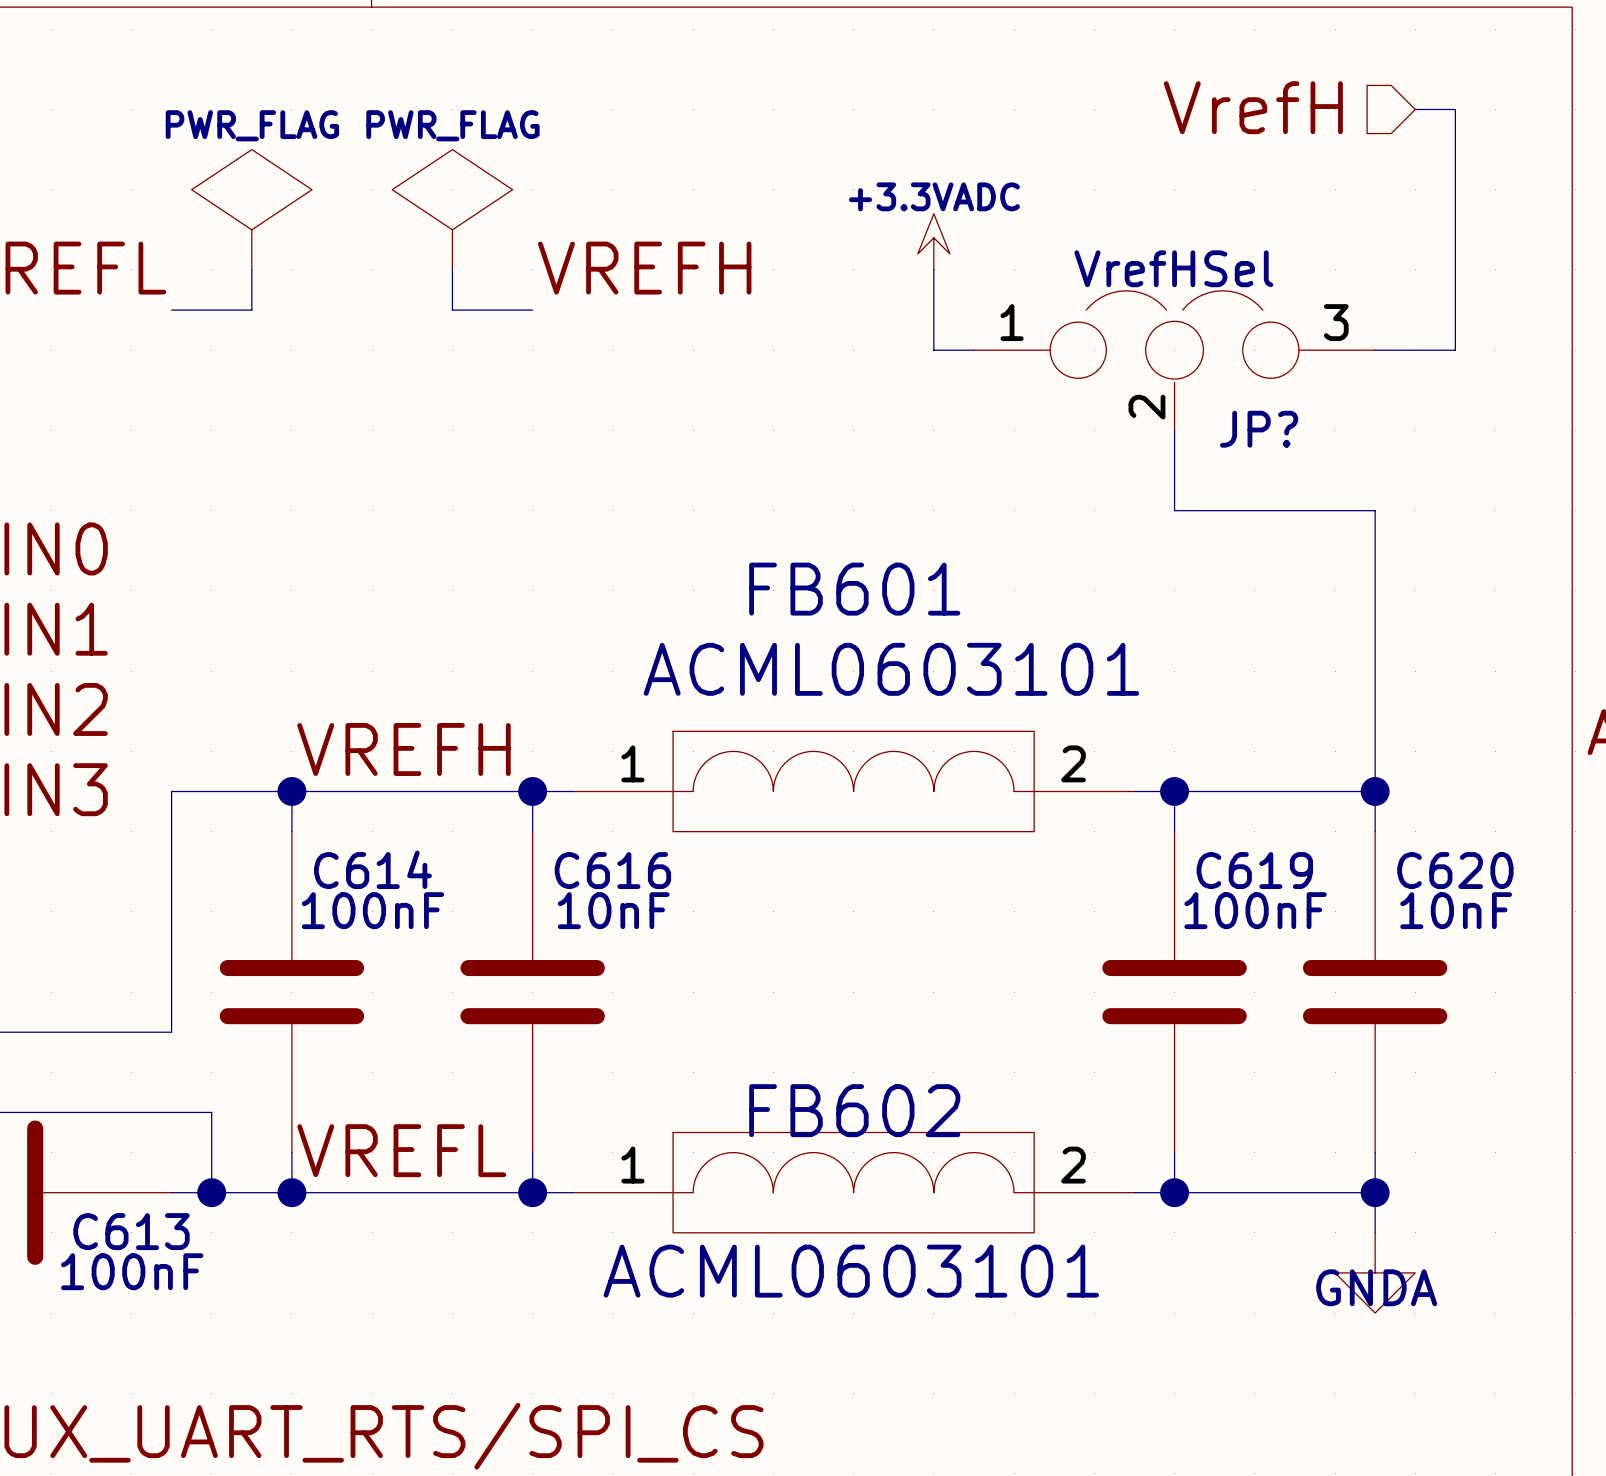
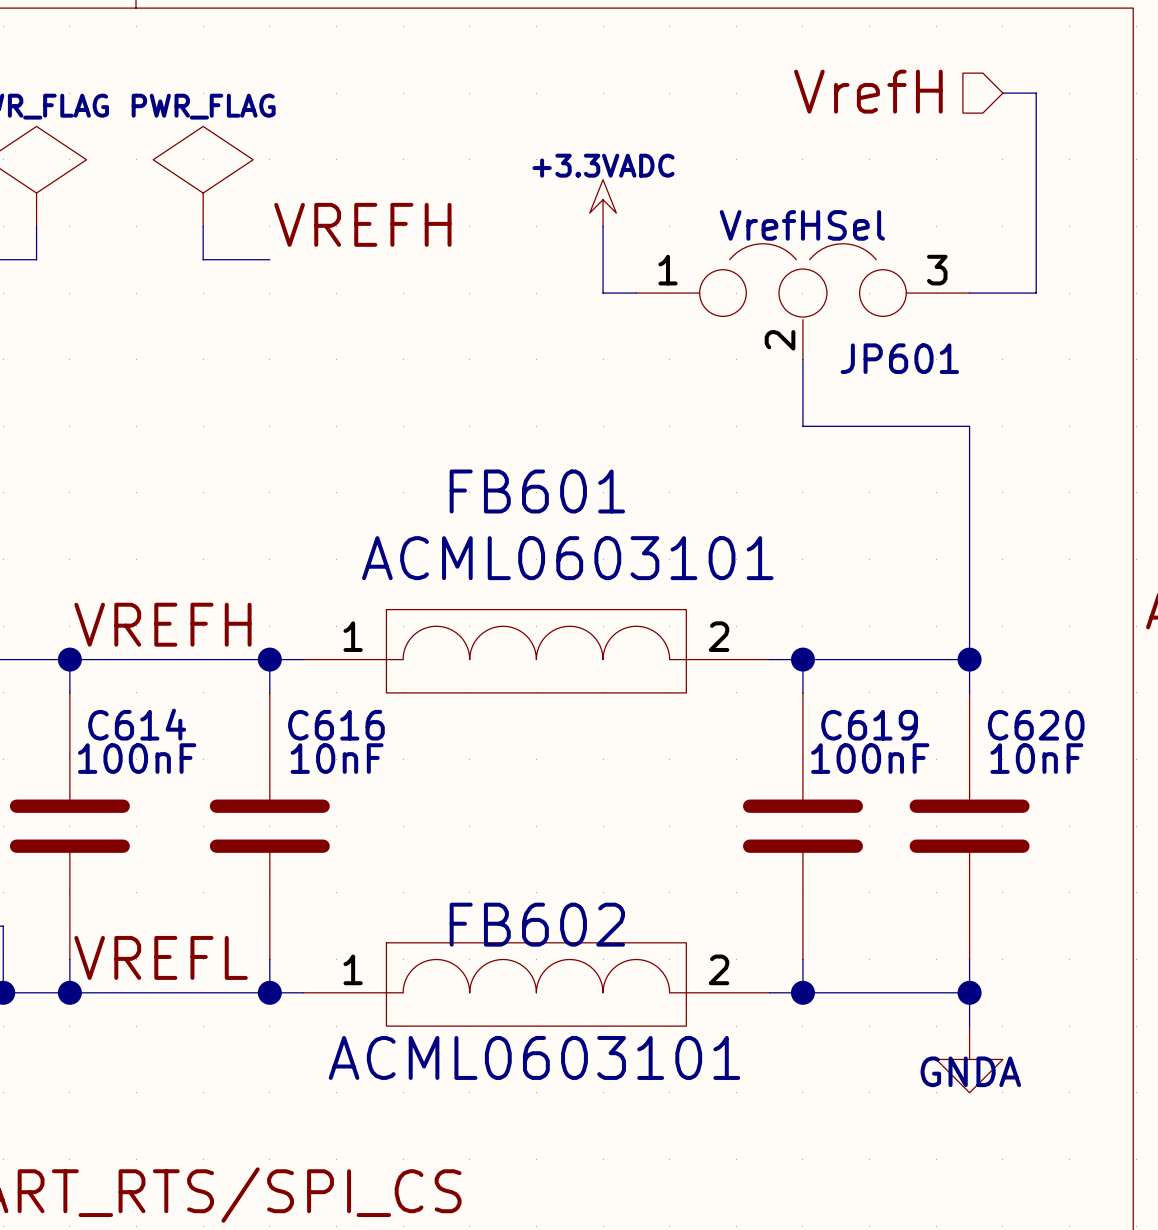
JP? name: JP? (1259, 429) -> JP601 (899, 358)

